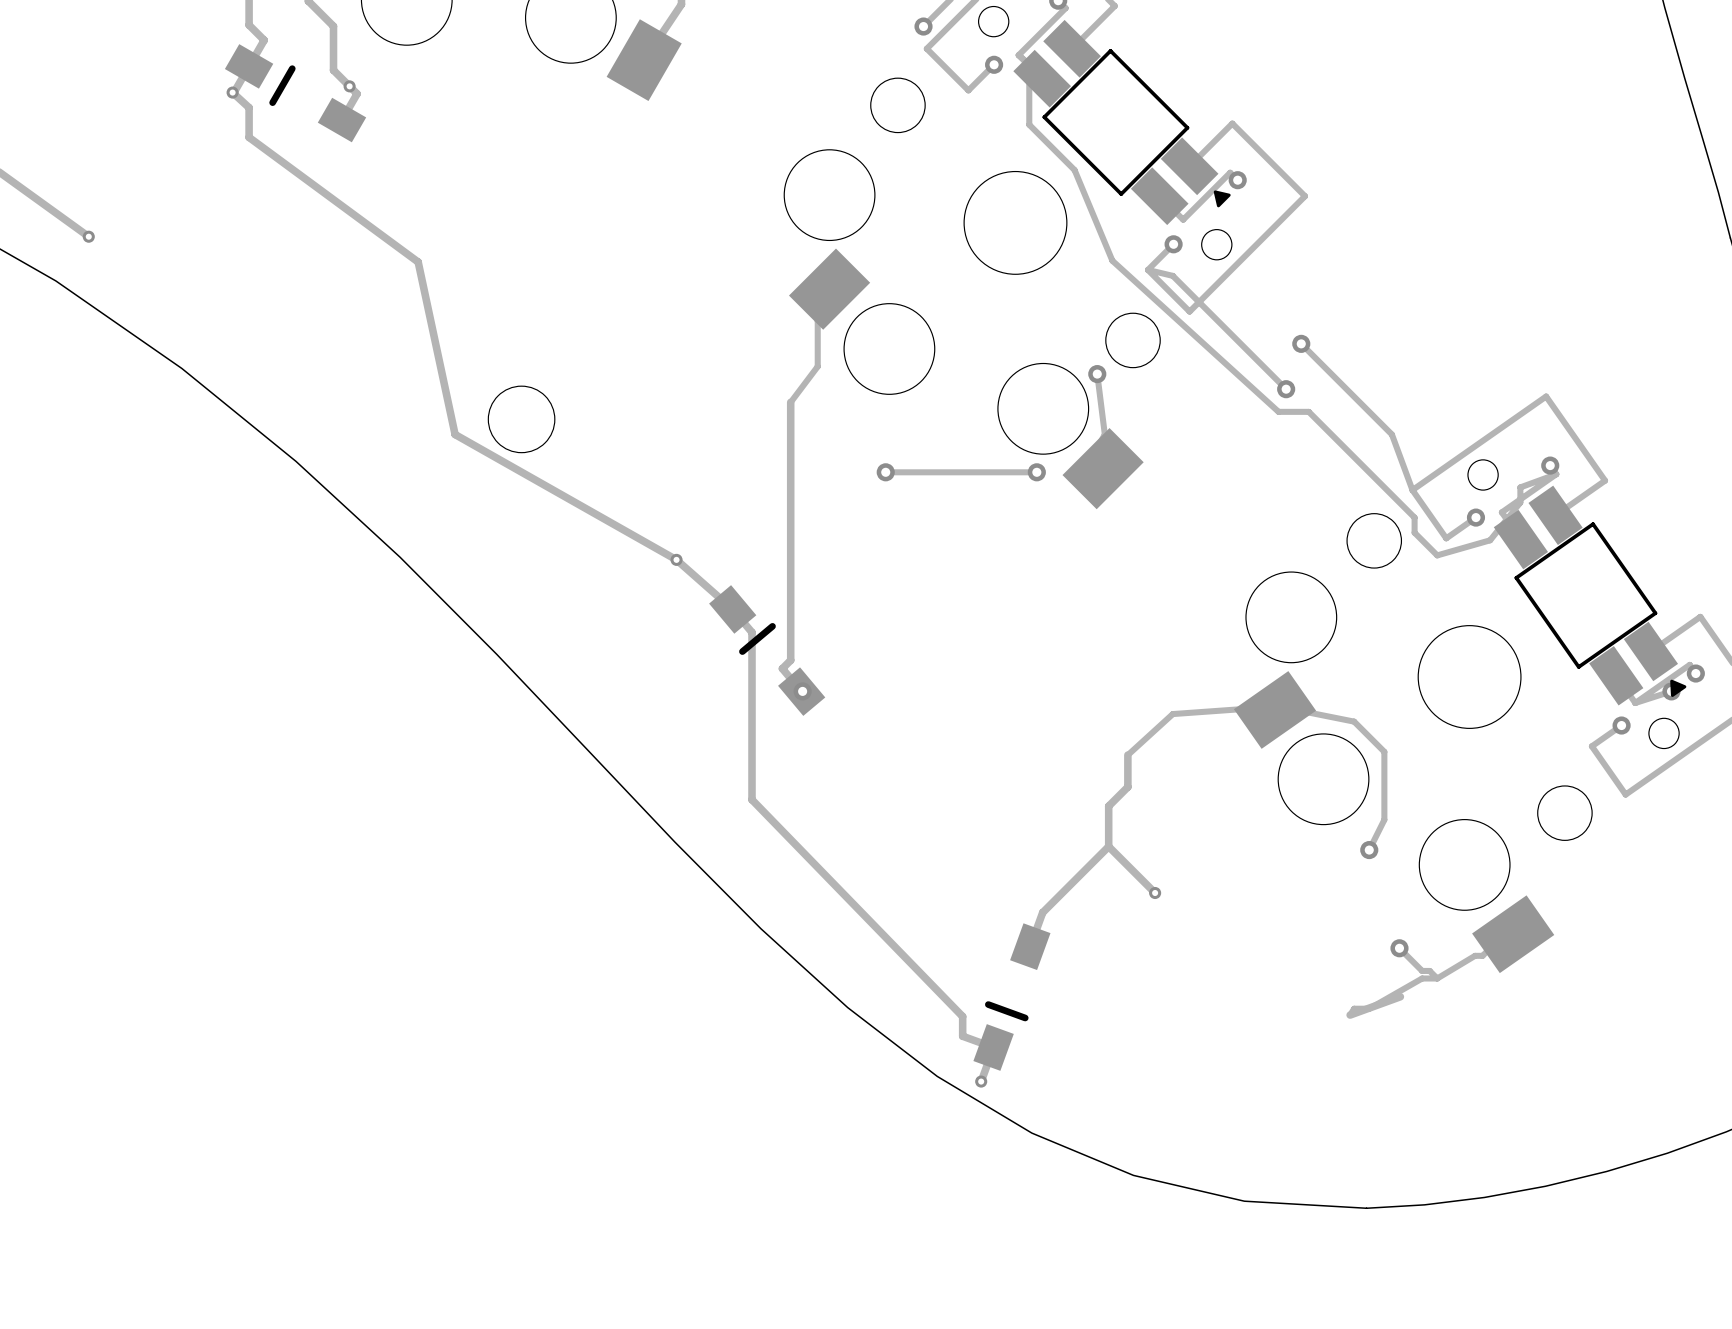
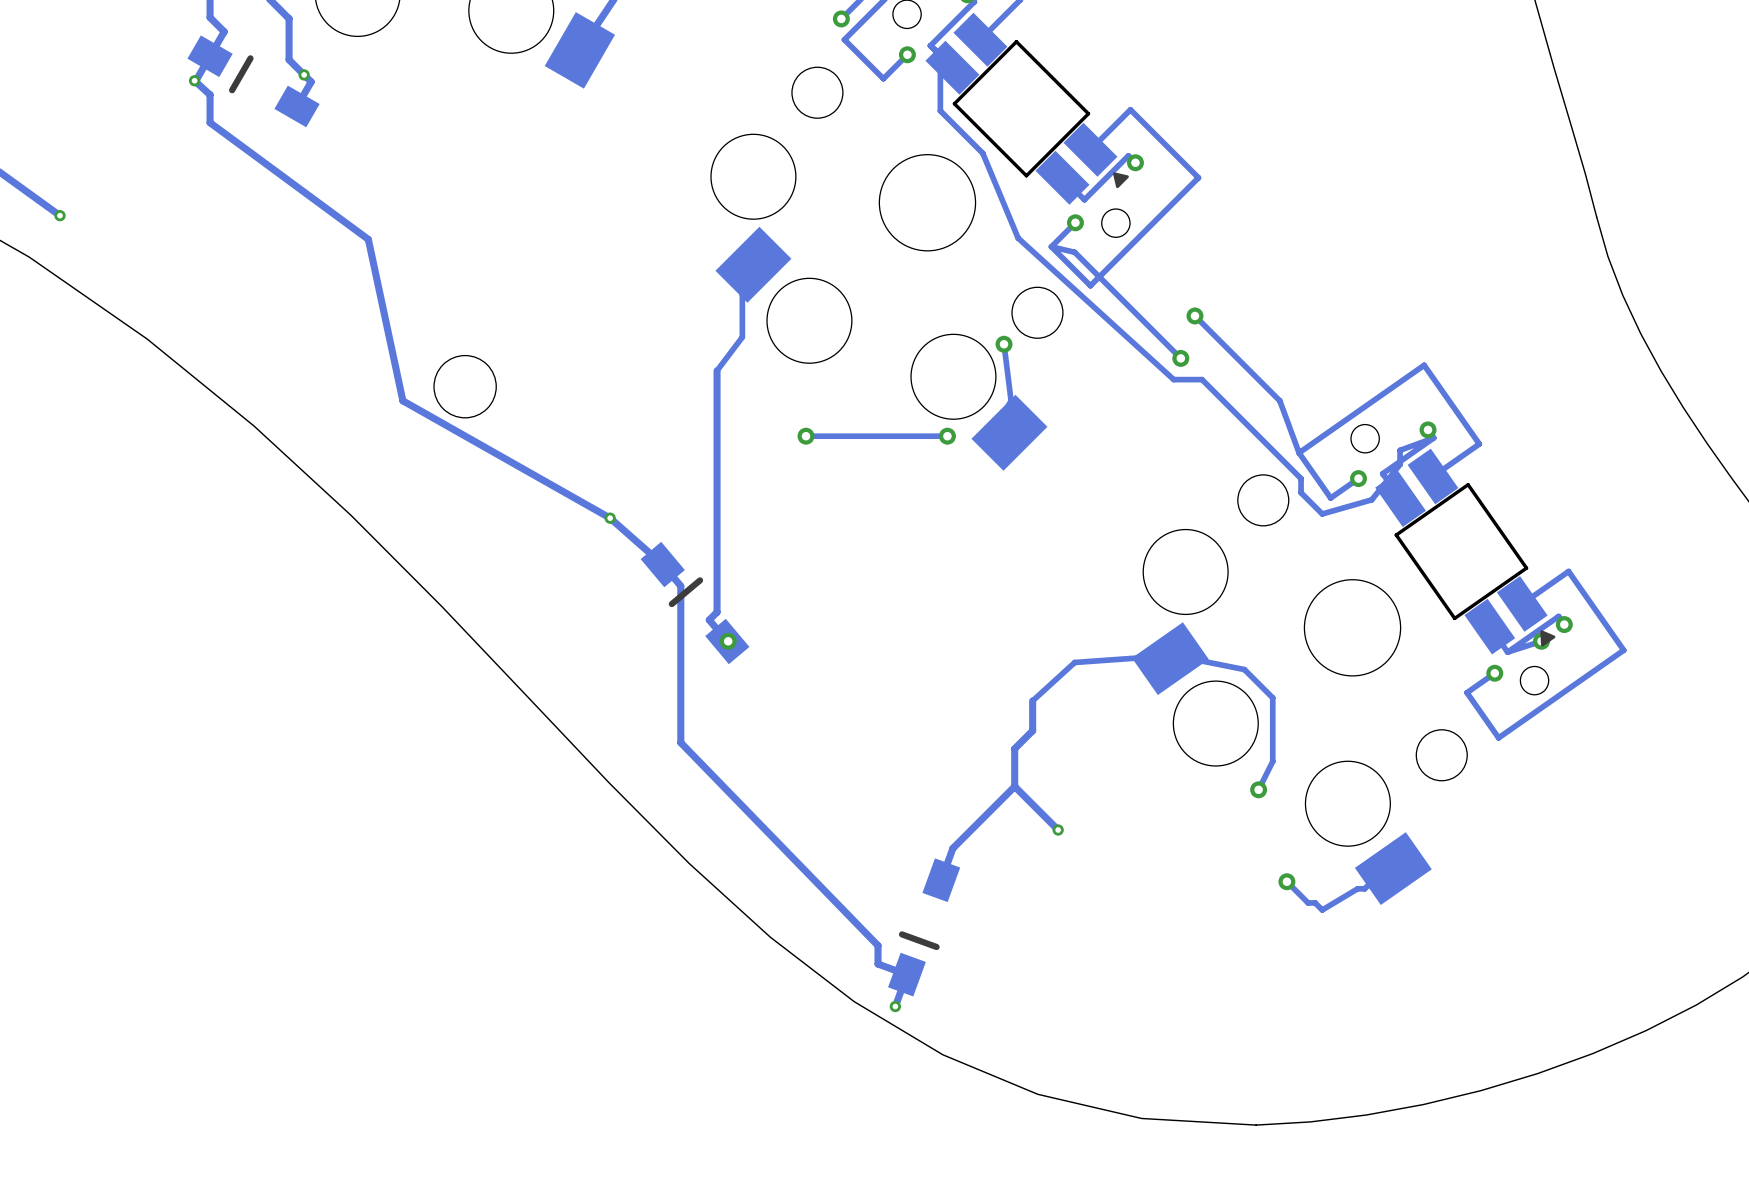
track: (1437, 978) (1422, 978) (1369, 1008) (1354, 1008) (1350, 1015) (1400, 996) -> none

